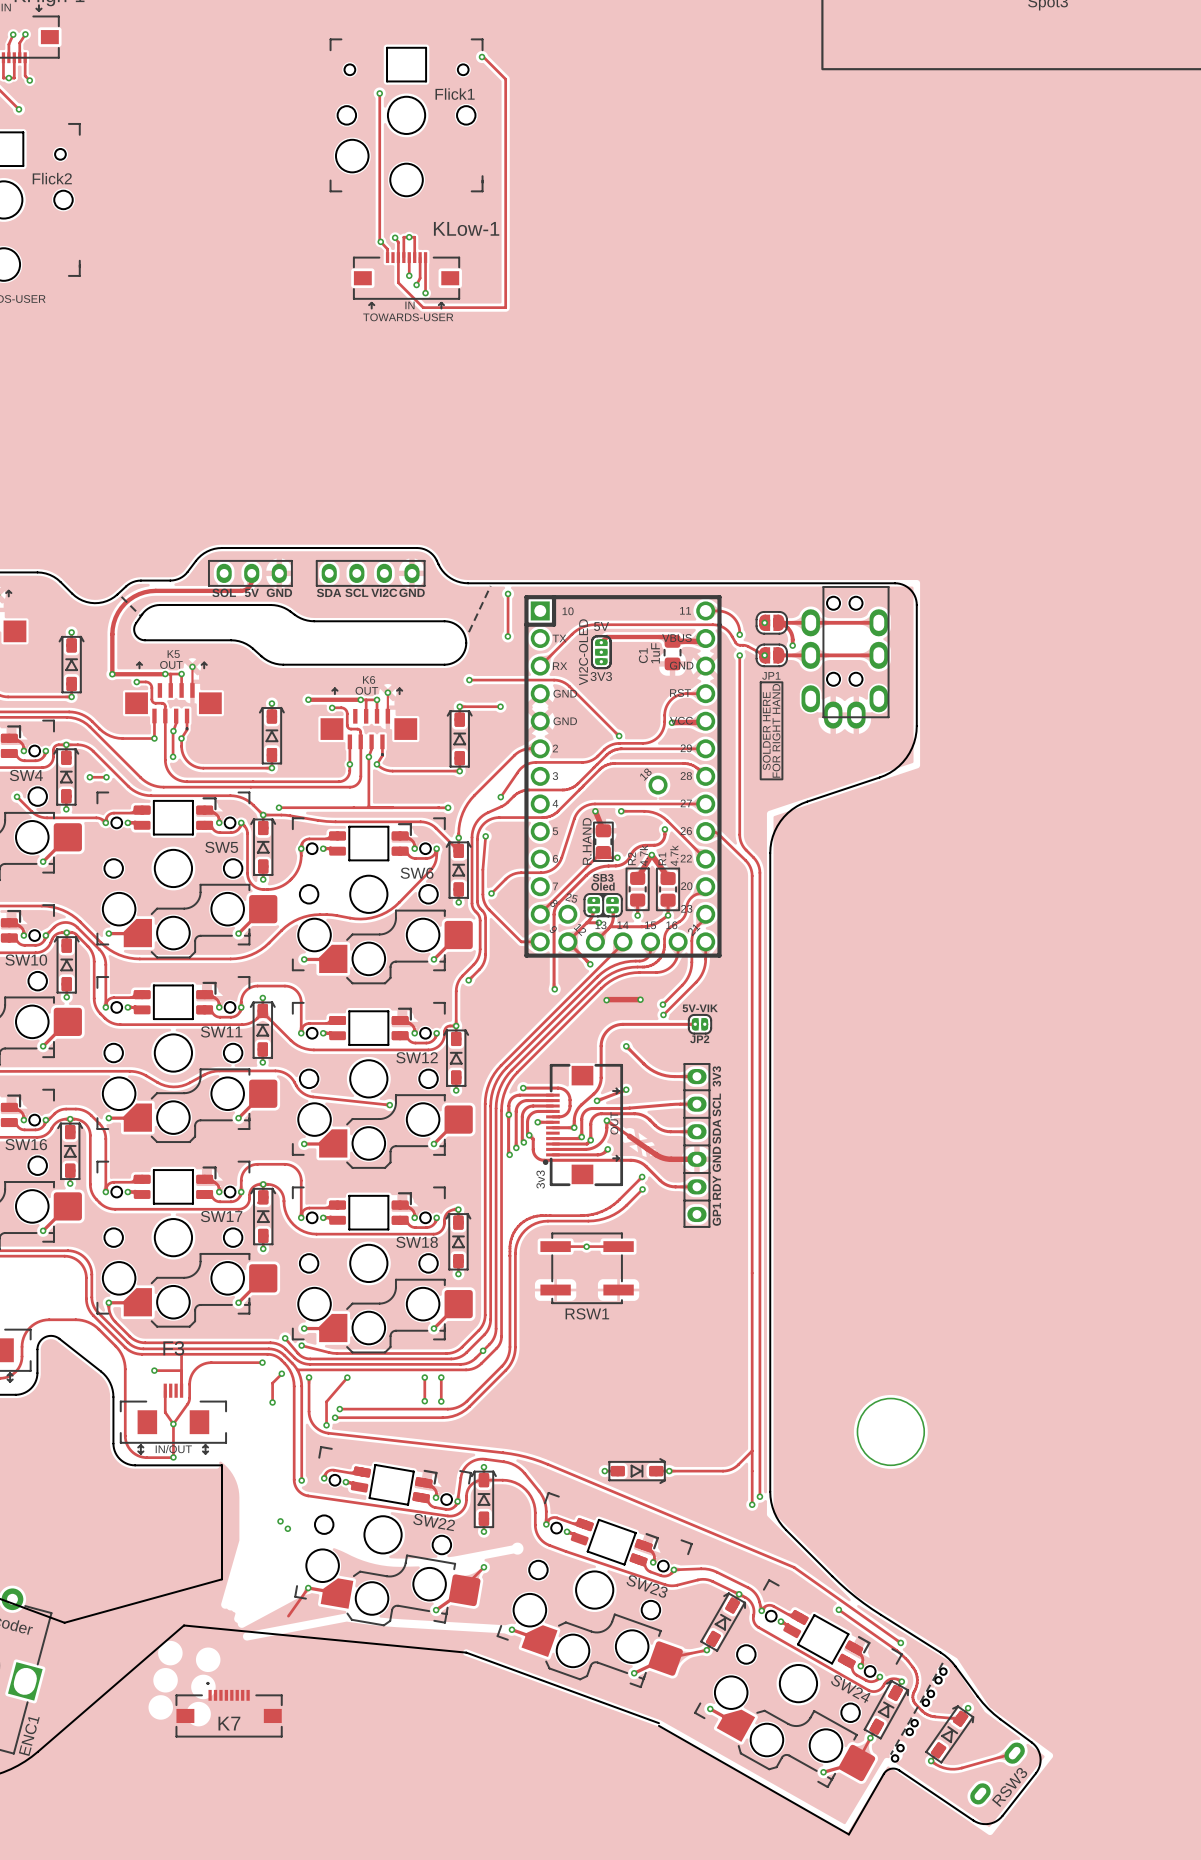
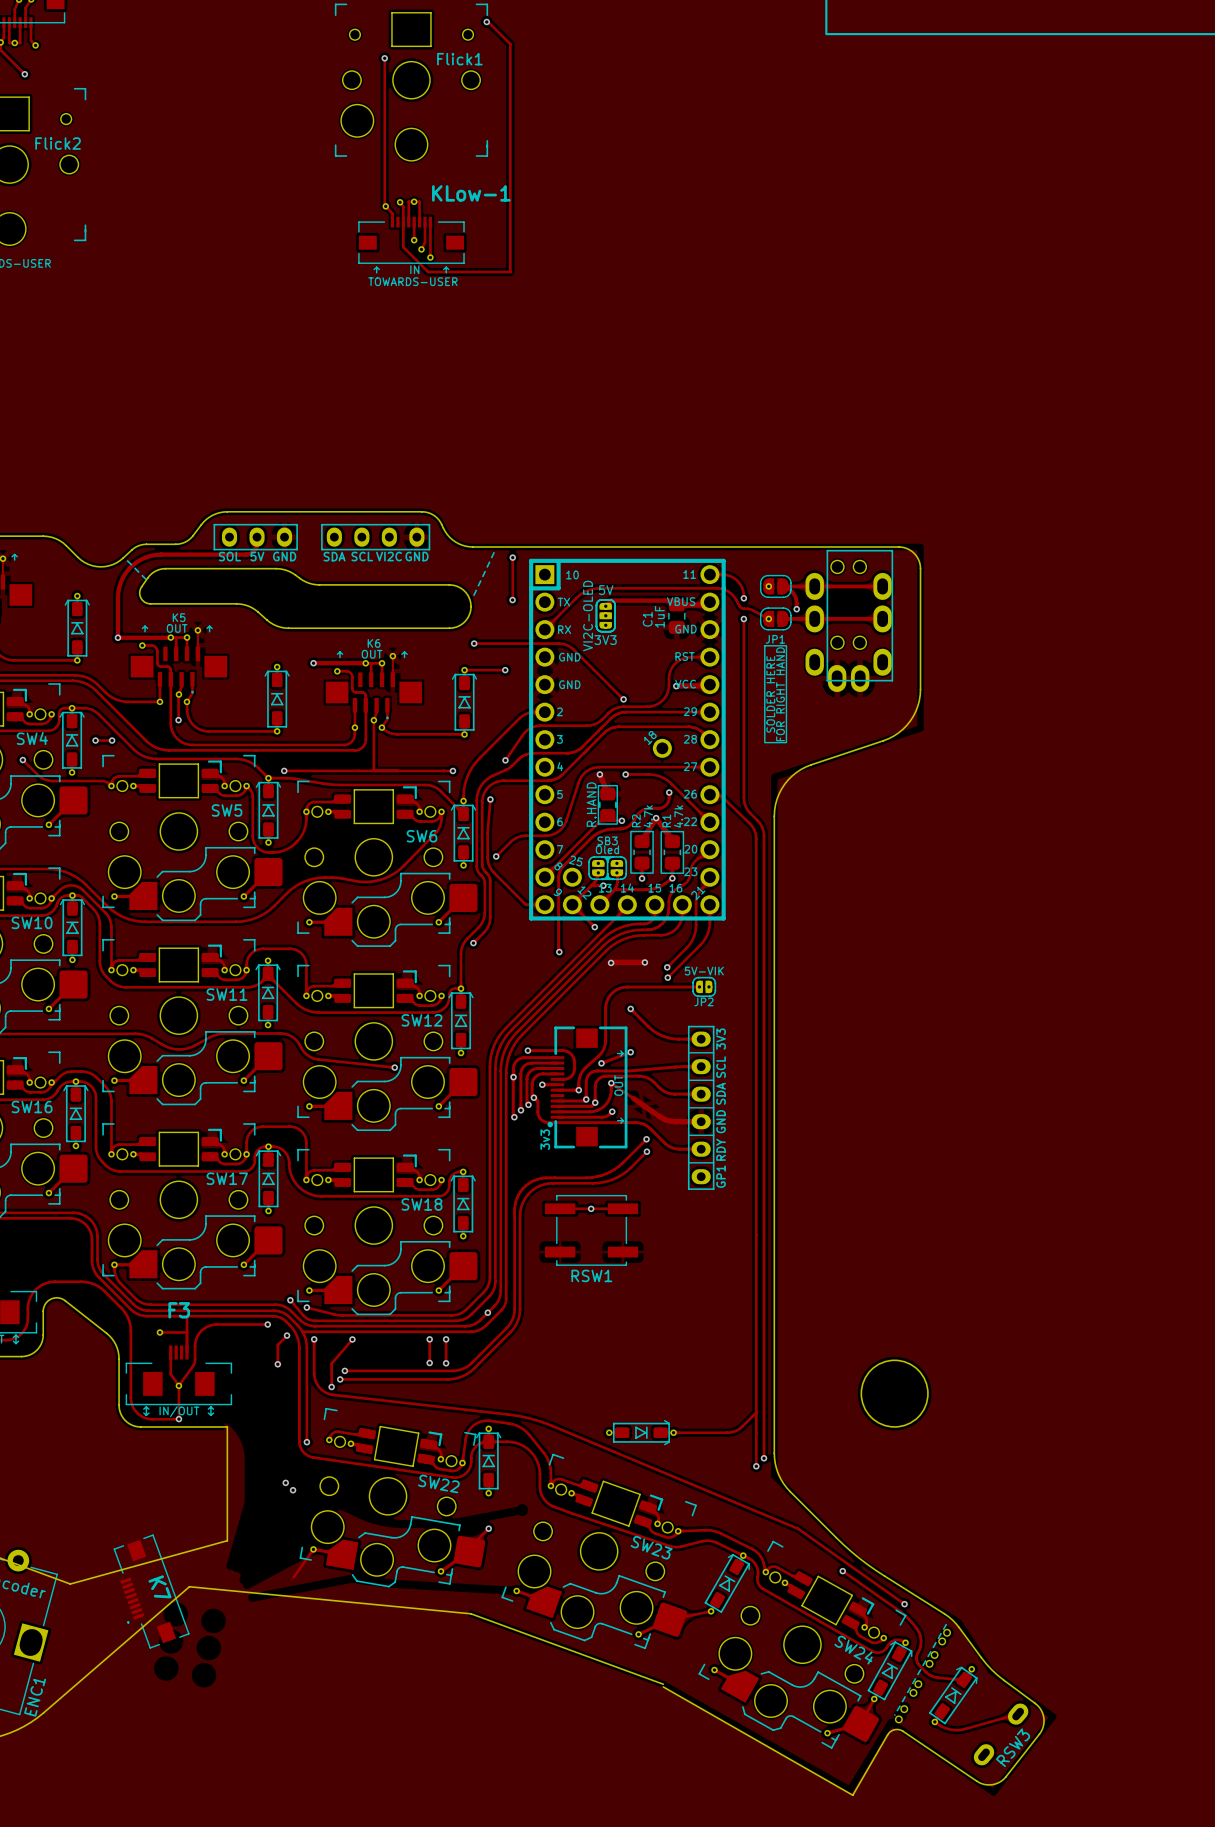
K7 footprint: [175, 1682, 283, 1738] -> [113, 1534, 190, 1649]

